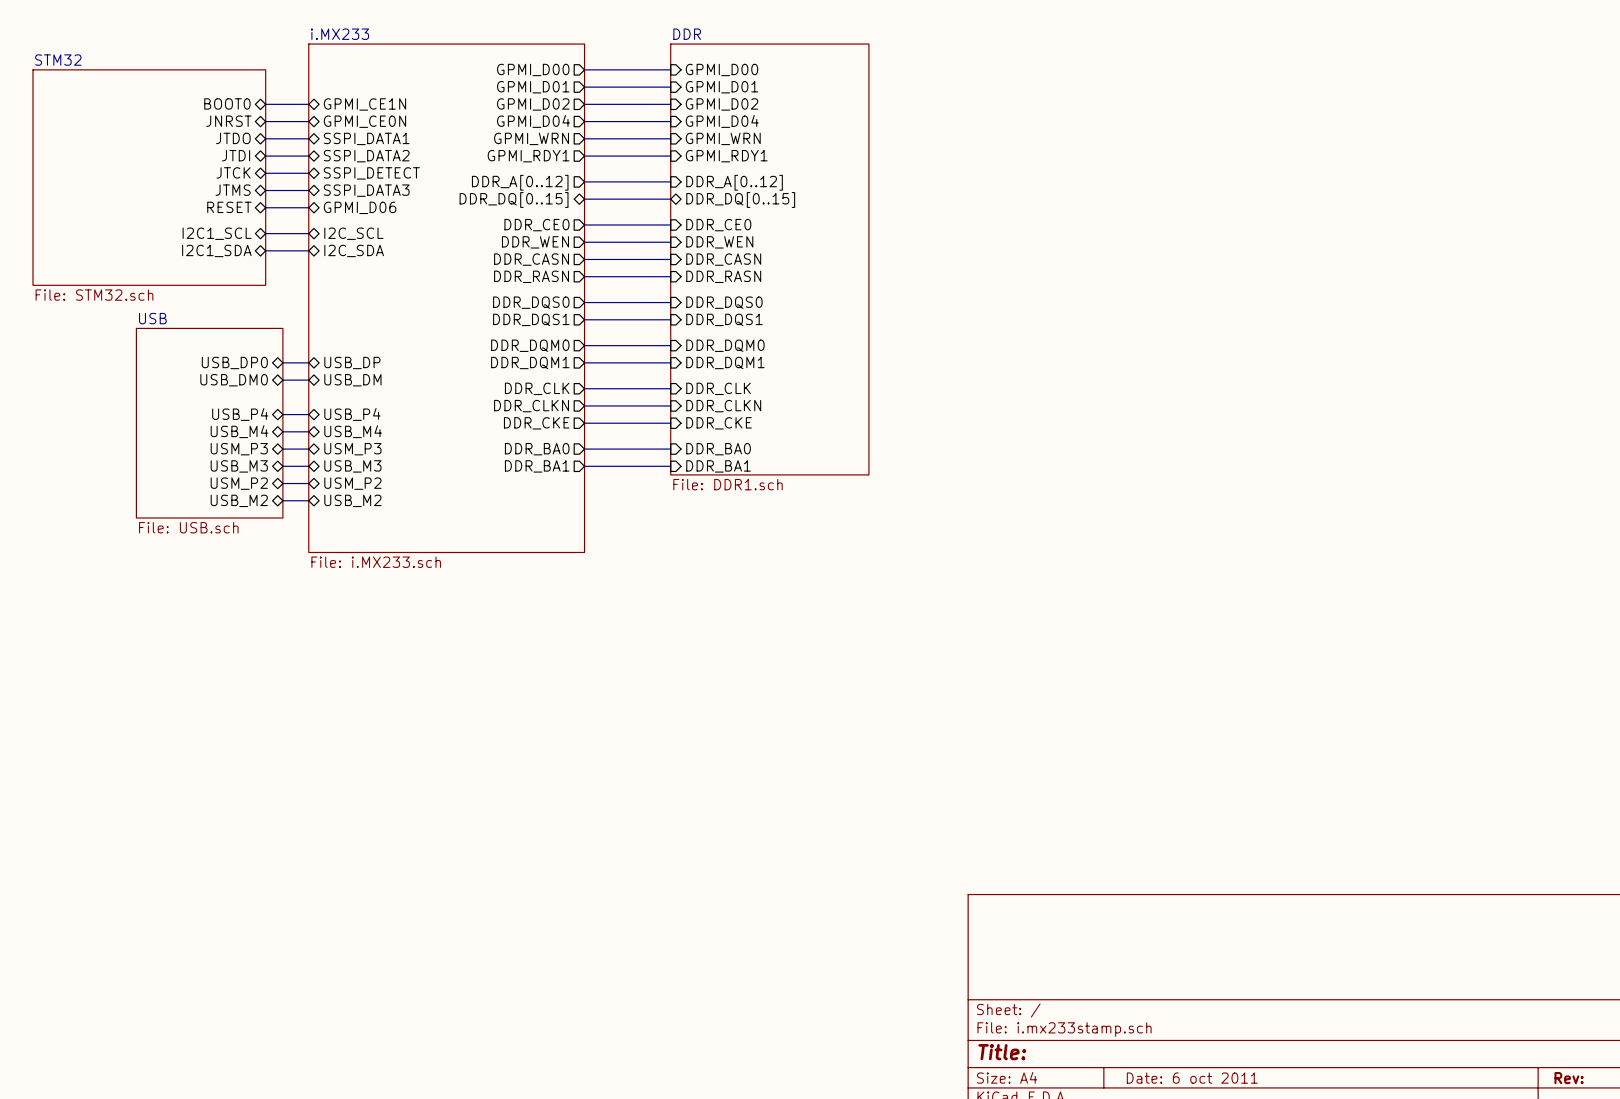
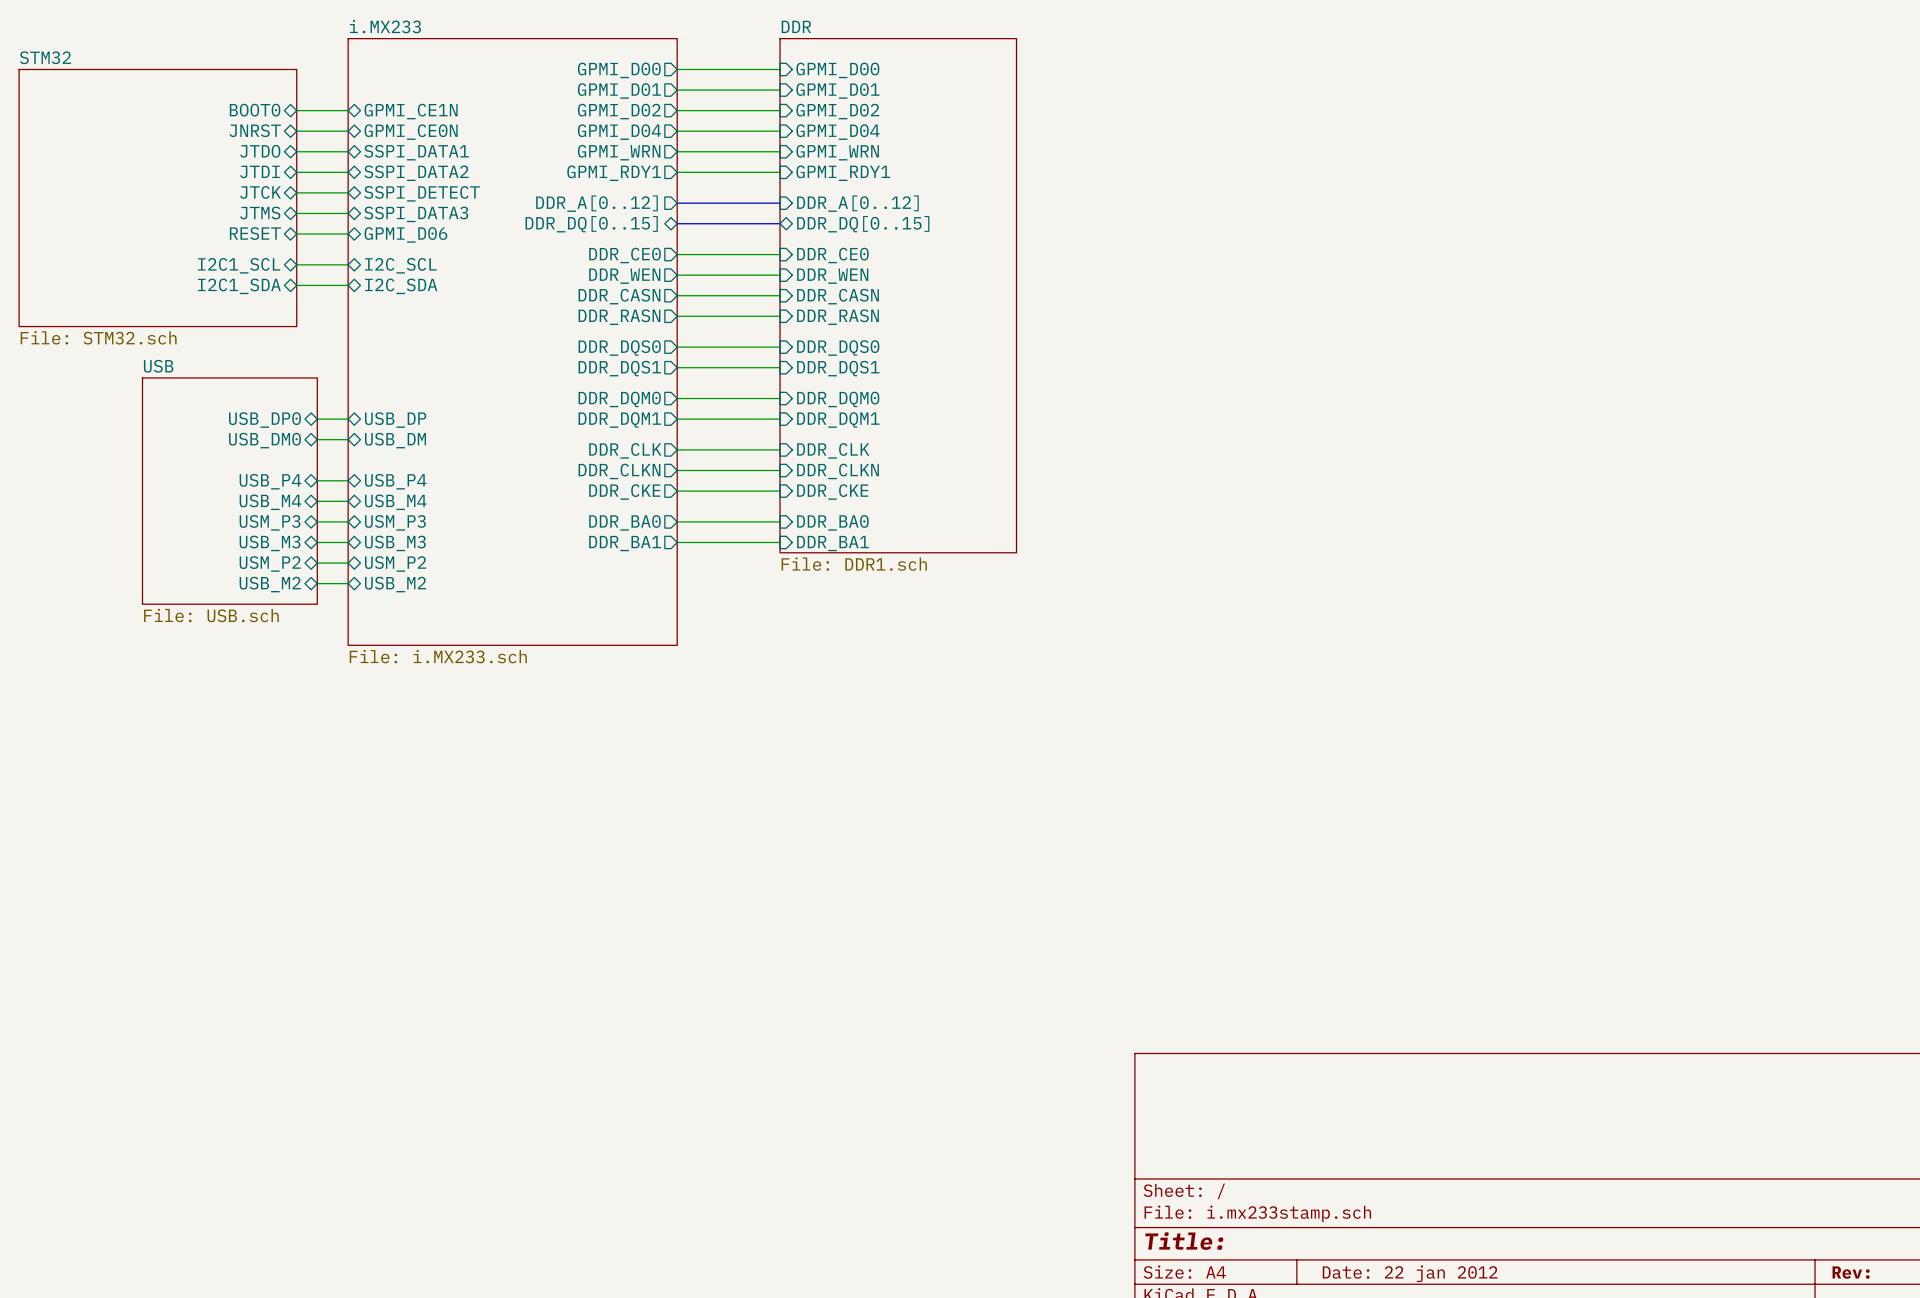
title block: Date: 6 oct 2011 (1192, 1078) -> Date: 22 jan 2012 (1410, 1273)

